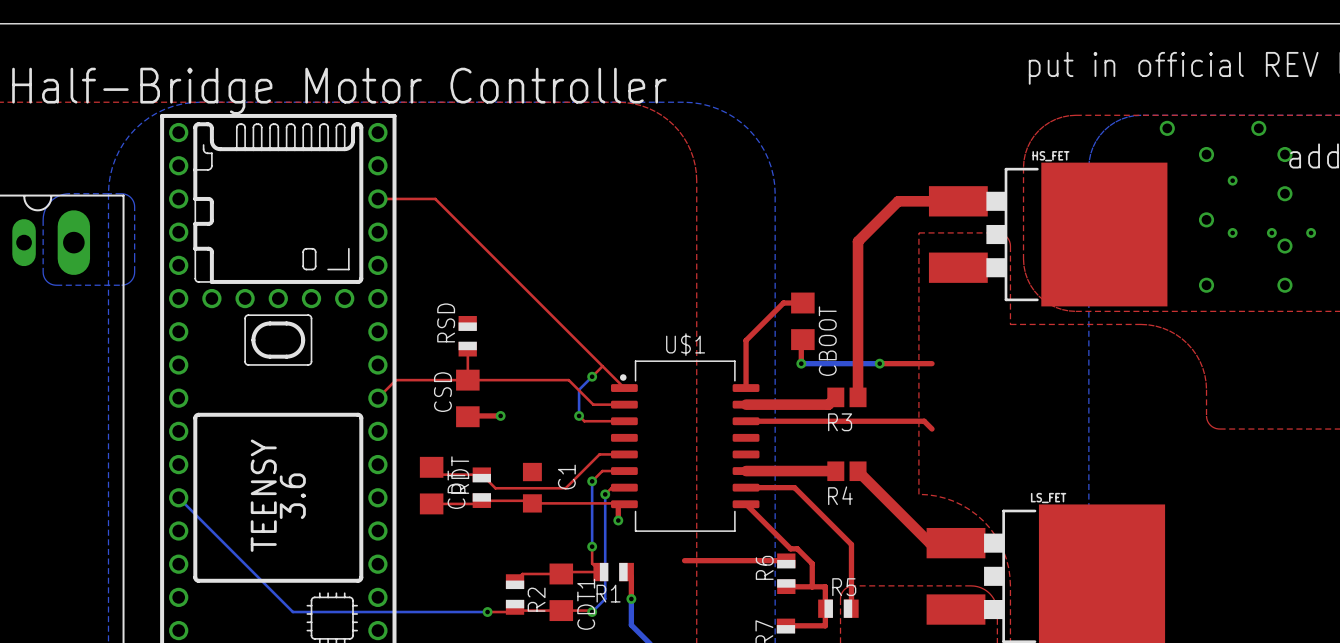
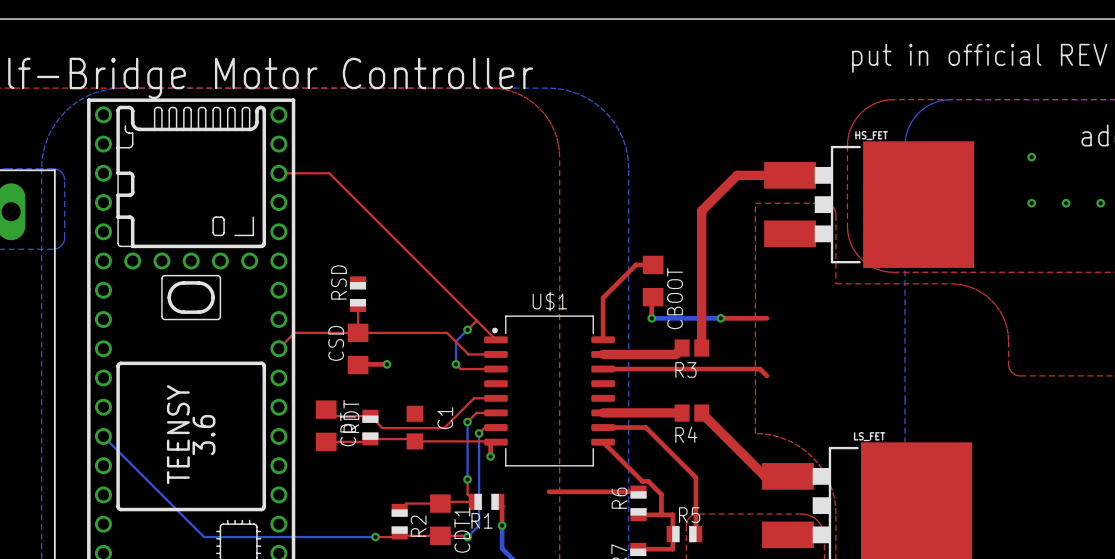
via: (1167, 128) -> none
via: (1258, 128) -> none
via: (1206, 154) -> none
via: (1284, 154) -> none
via: (1284, 193) -> none
via: (1206, 219) -> none
via: (1284, 246) -> none
via: (1206, 285) -> none
via: (1284, 285) -> none

